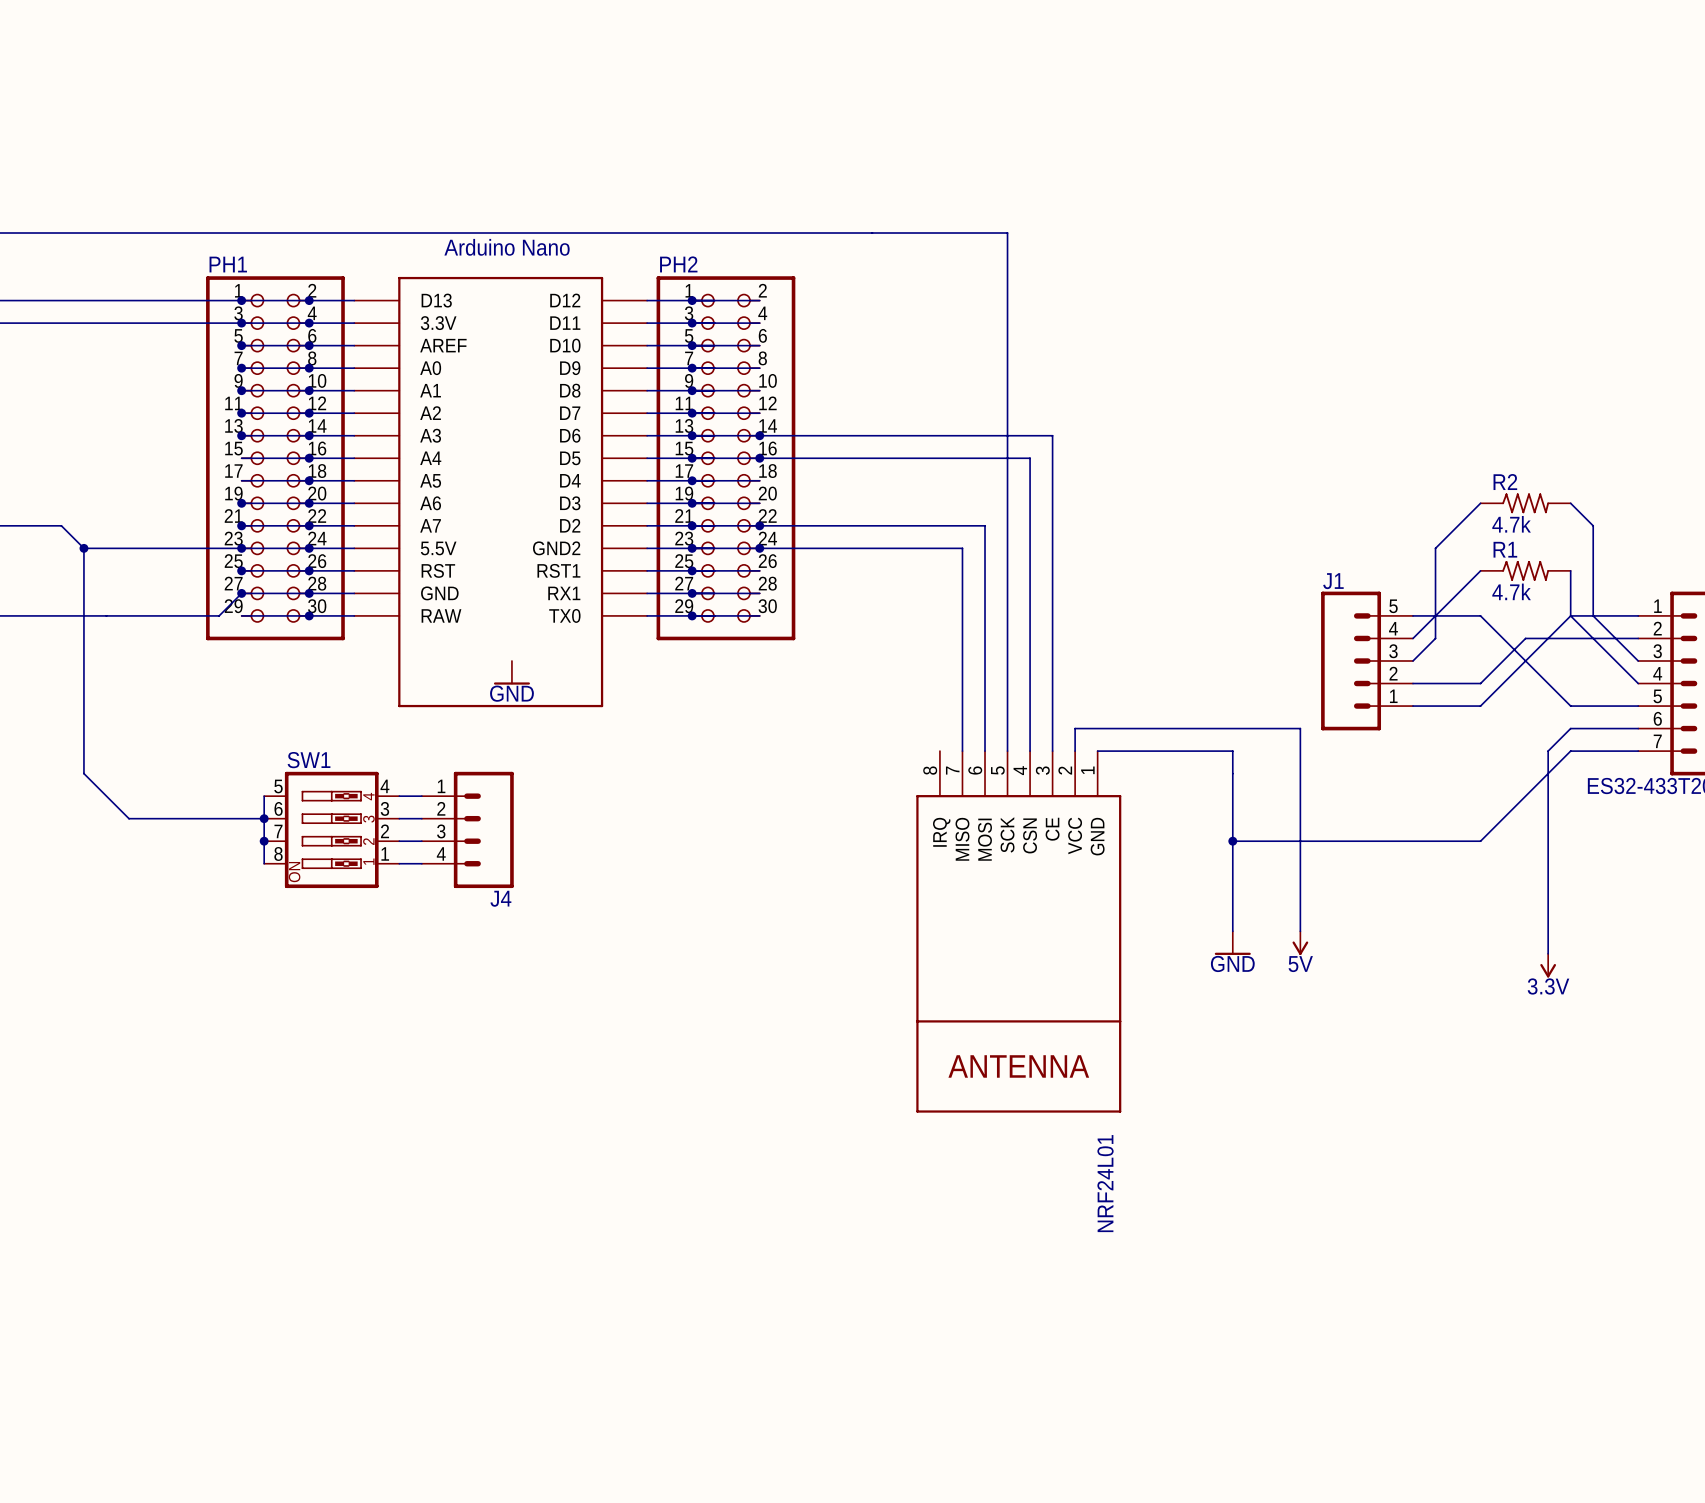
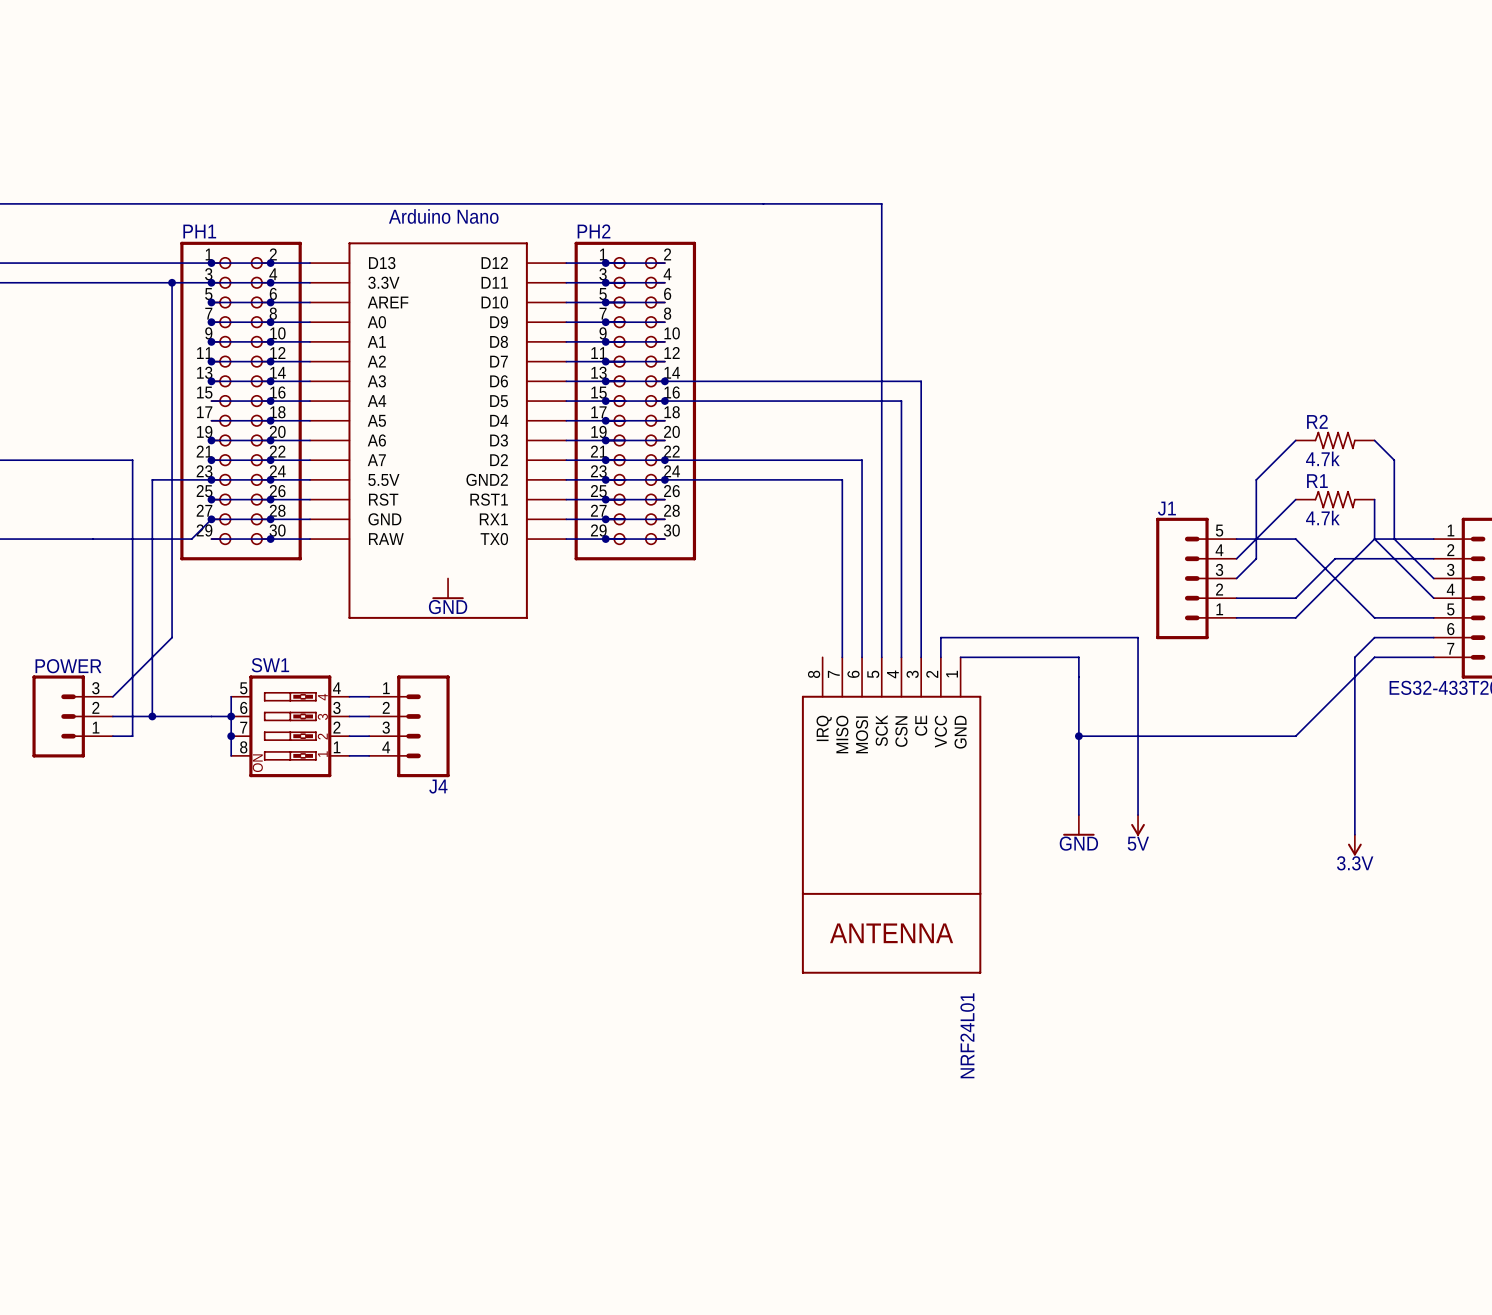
wire: none -> (172, 282) (172, 637) (112, 696)
junction: none -> (172, 282)
wire: (61, 525) (83, 548) -> (53, 460) (132, 460) (132, 736) (112, 736)
wire: (83, 548) (174, 548) -> (152, 716) (152, 479)
wire: (83, 548) (83, 773) (129, 818) -> none
junction: (83, 548) -> none
POWER: none -> (72, 716)
junction: none -> (152, 716)

